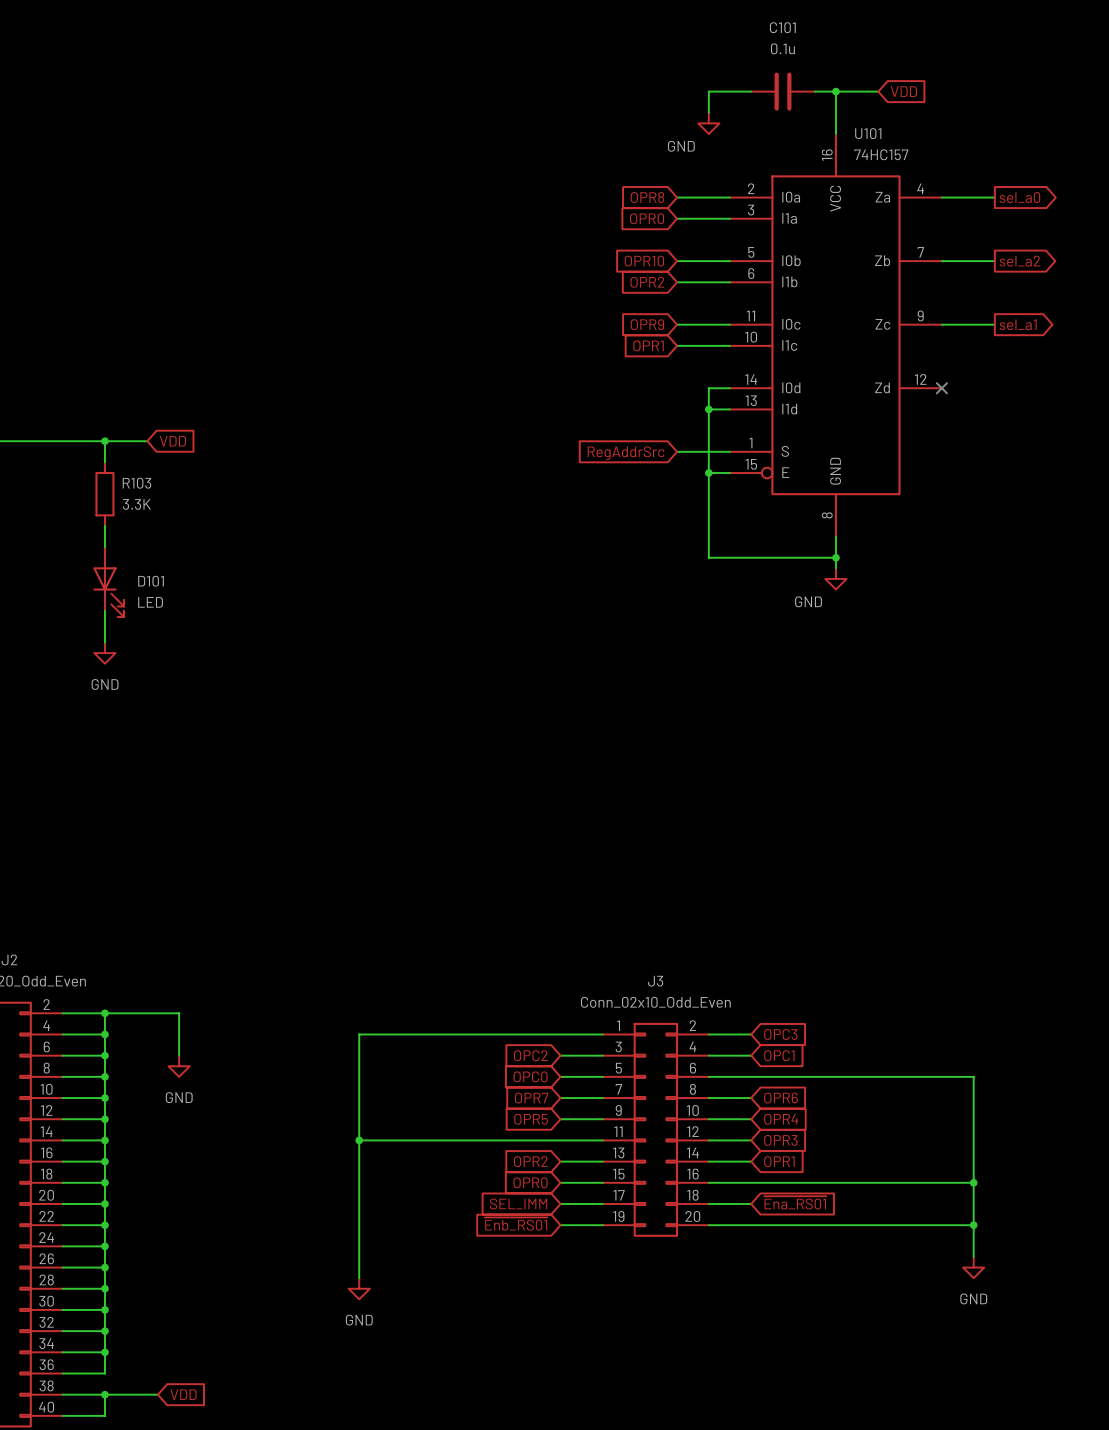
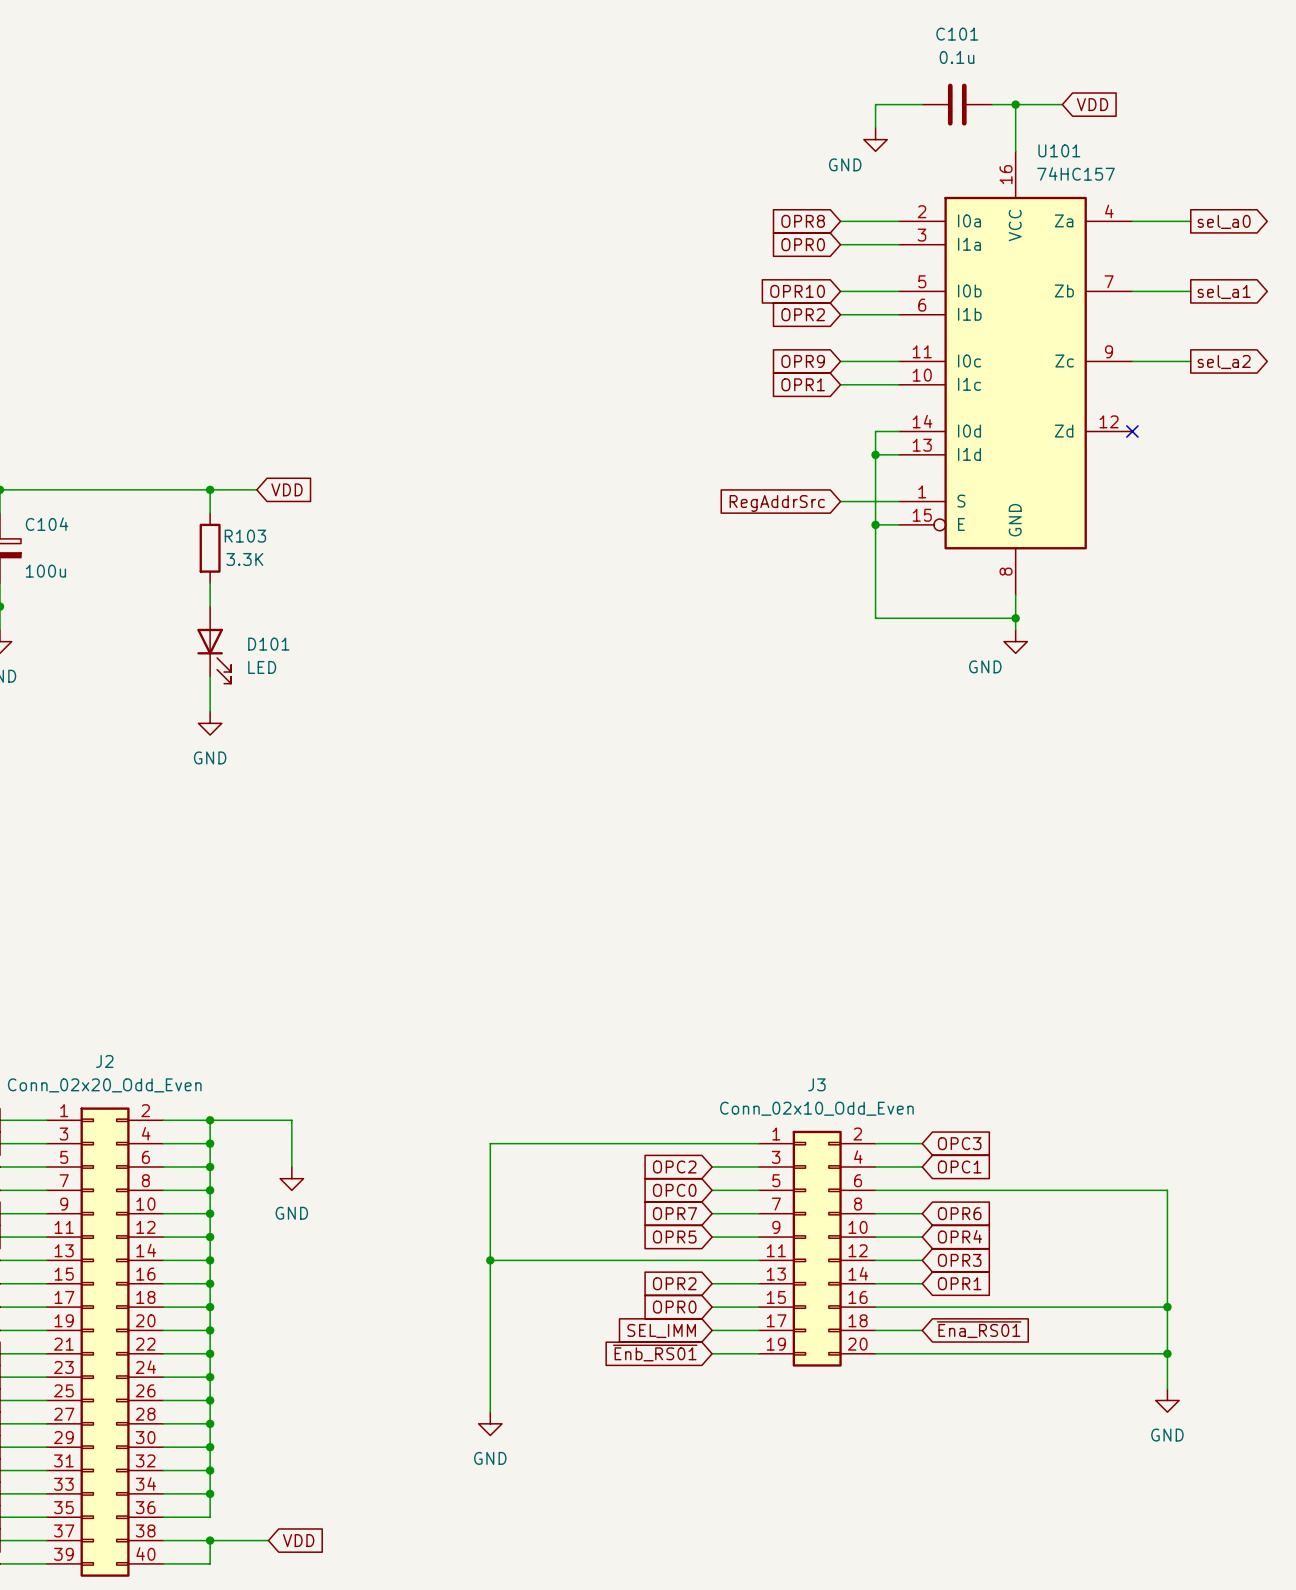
global label: sel_a2 (1019, 261) -> sel_a1 (1224, 291)
global label: sel_a1 (1018, 324) -> sel_a2 (1224, 362)

